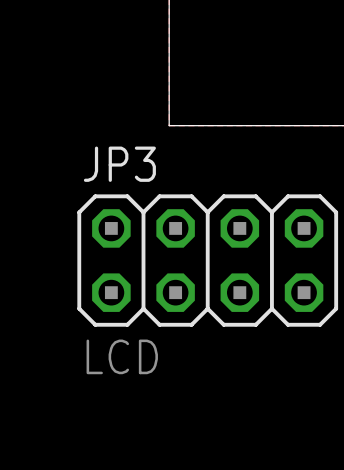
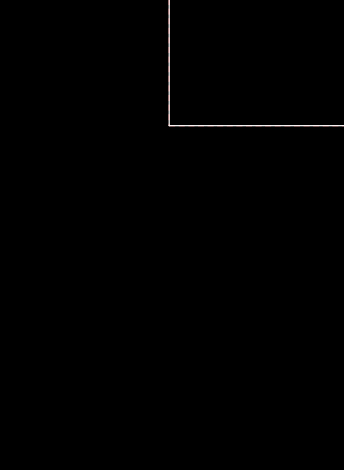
JP3: LCD (207, 260) -> none

